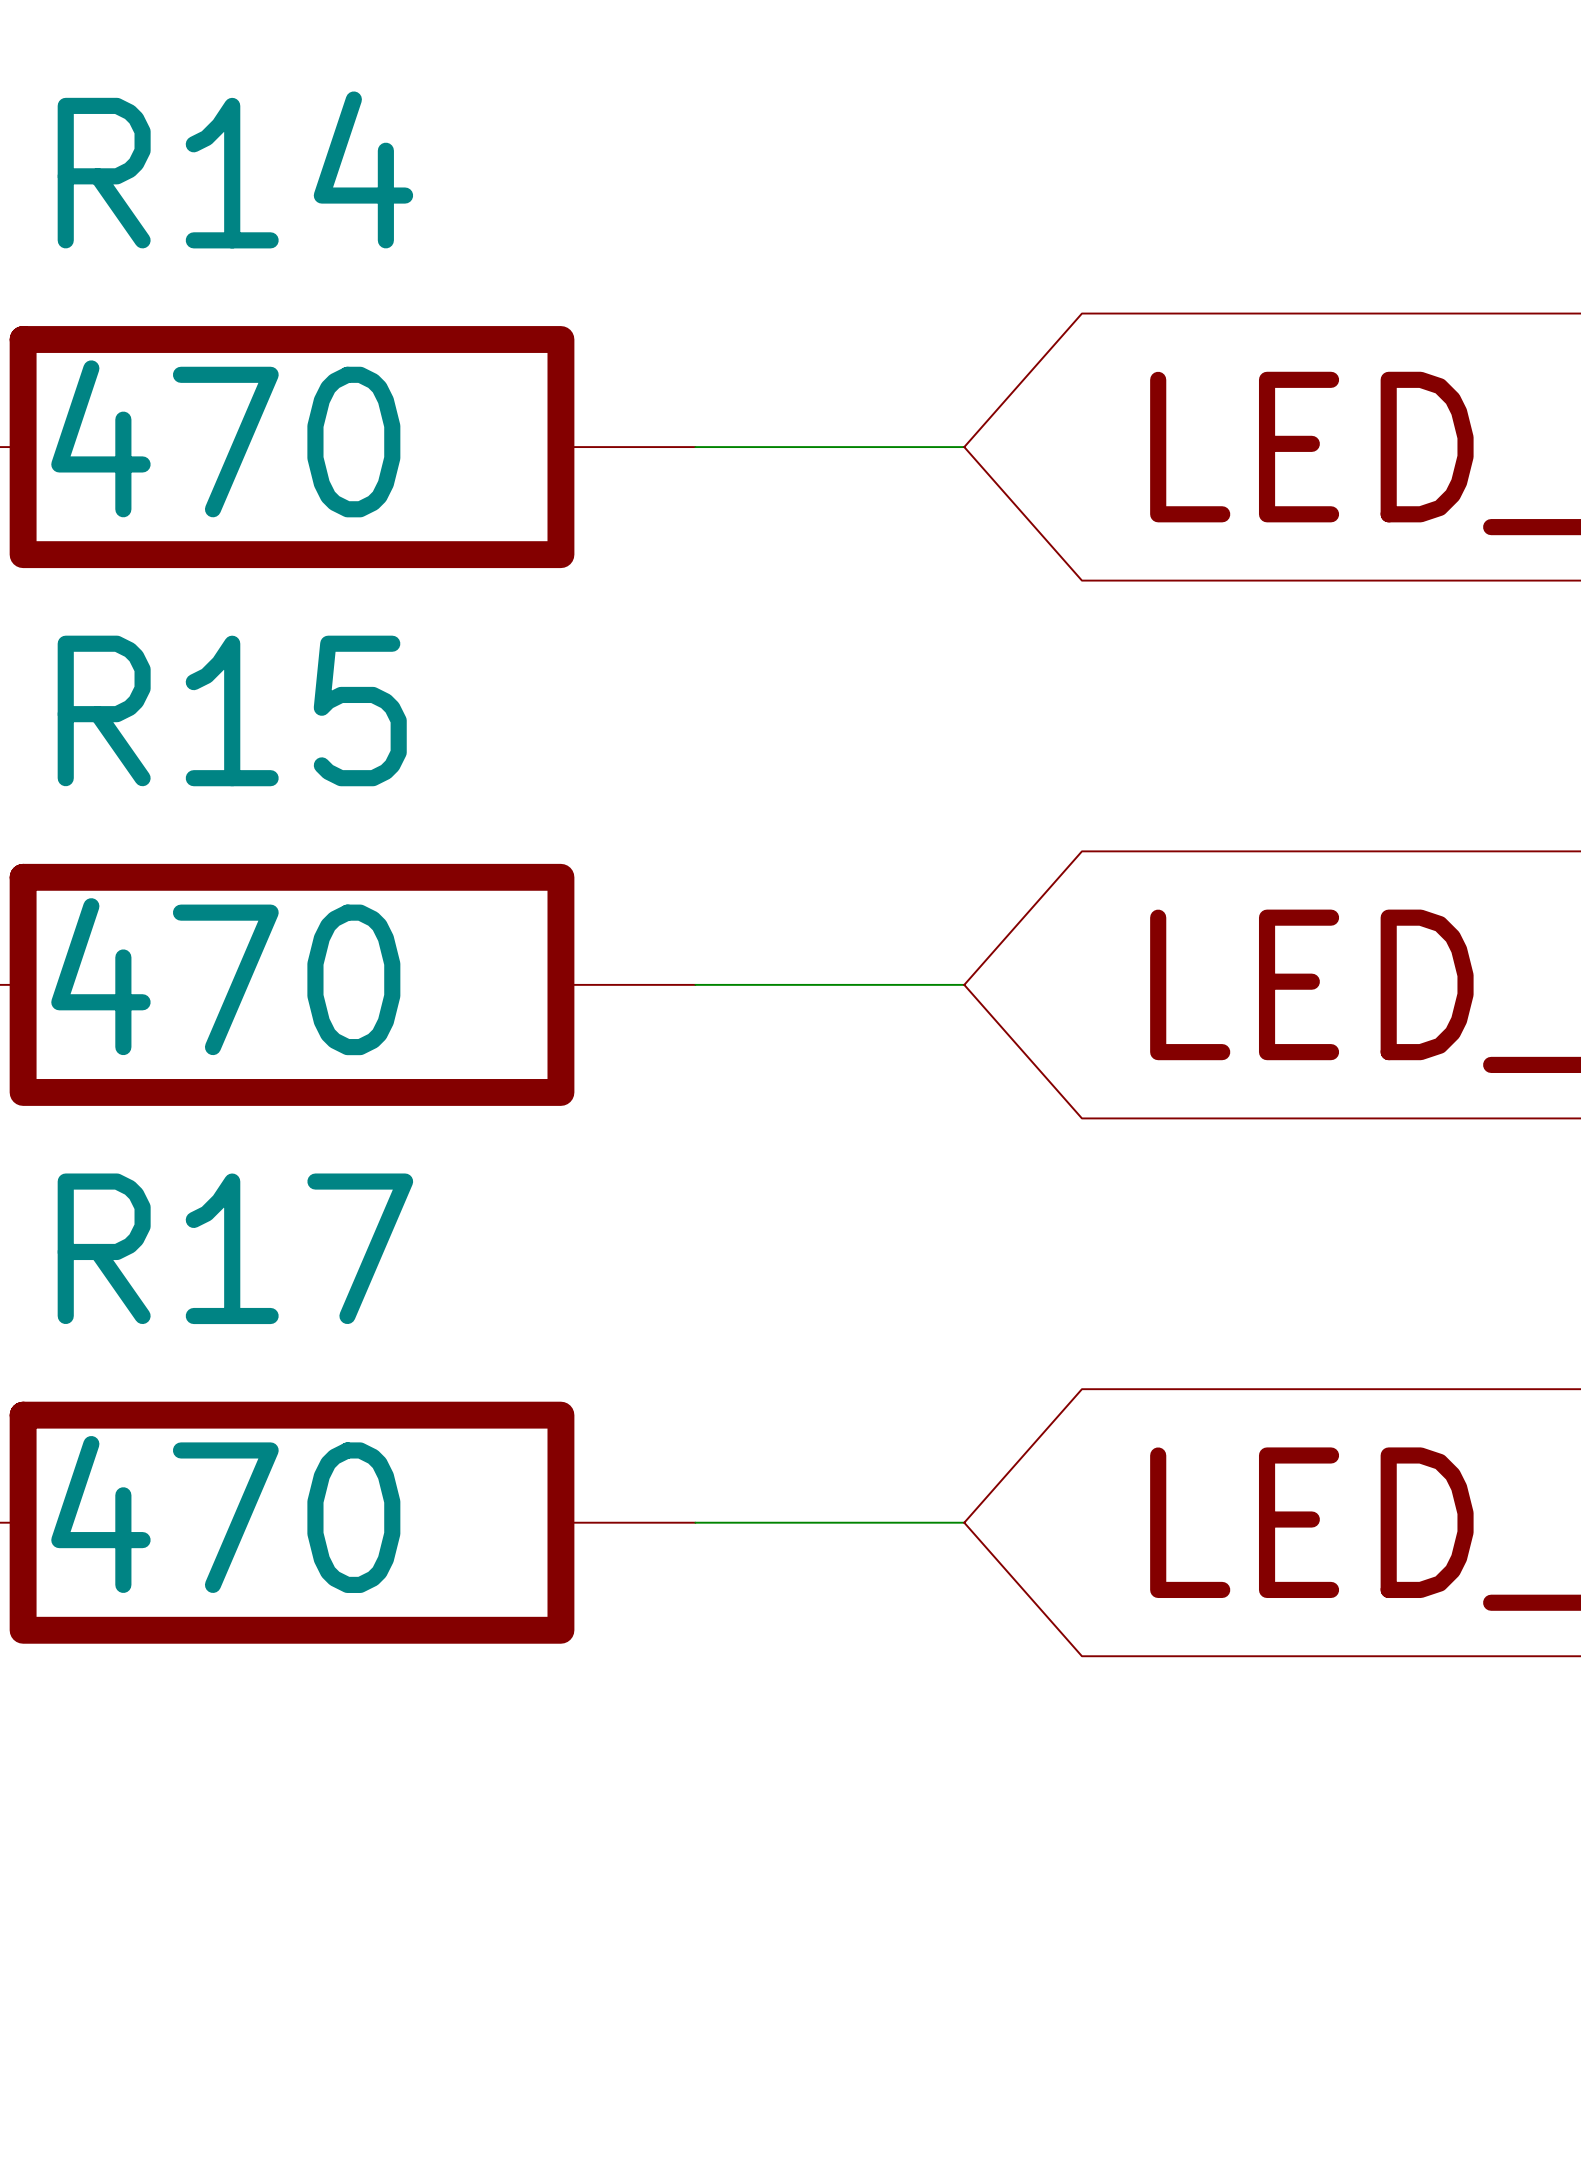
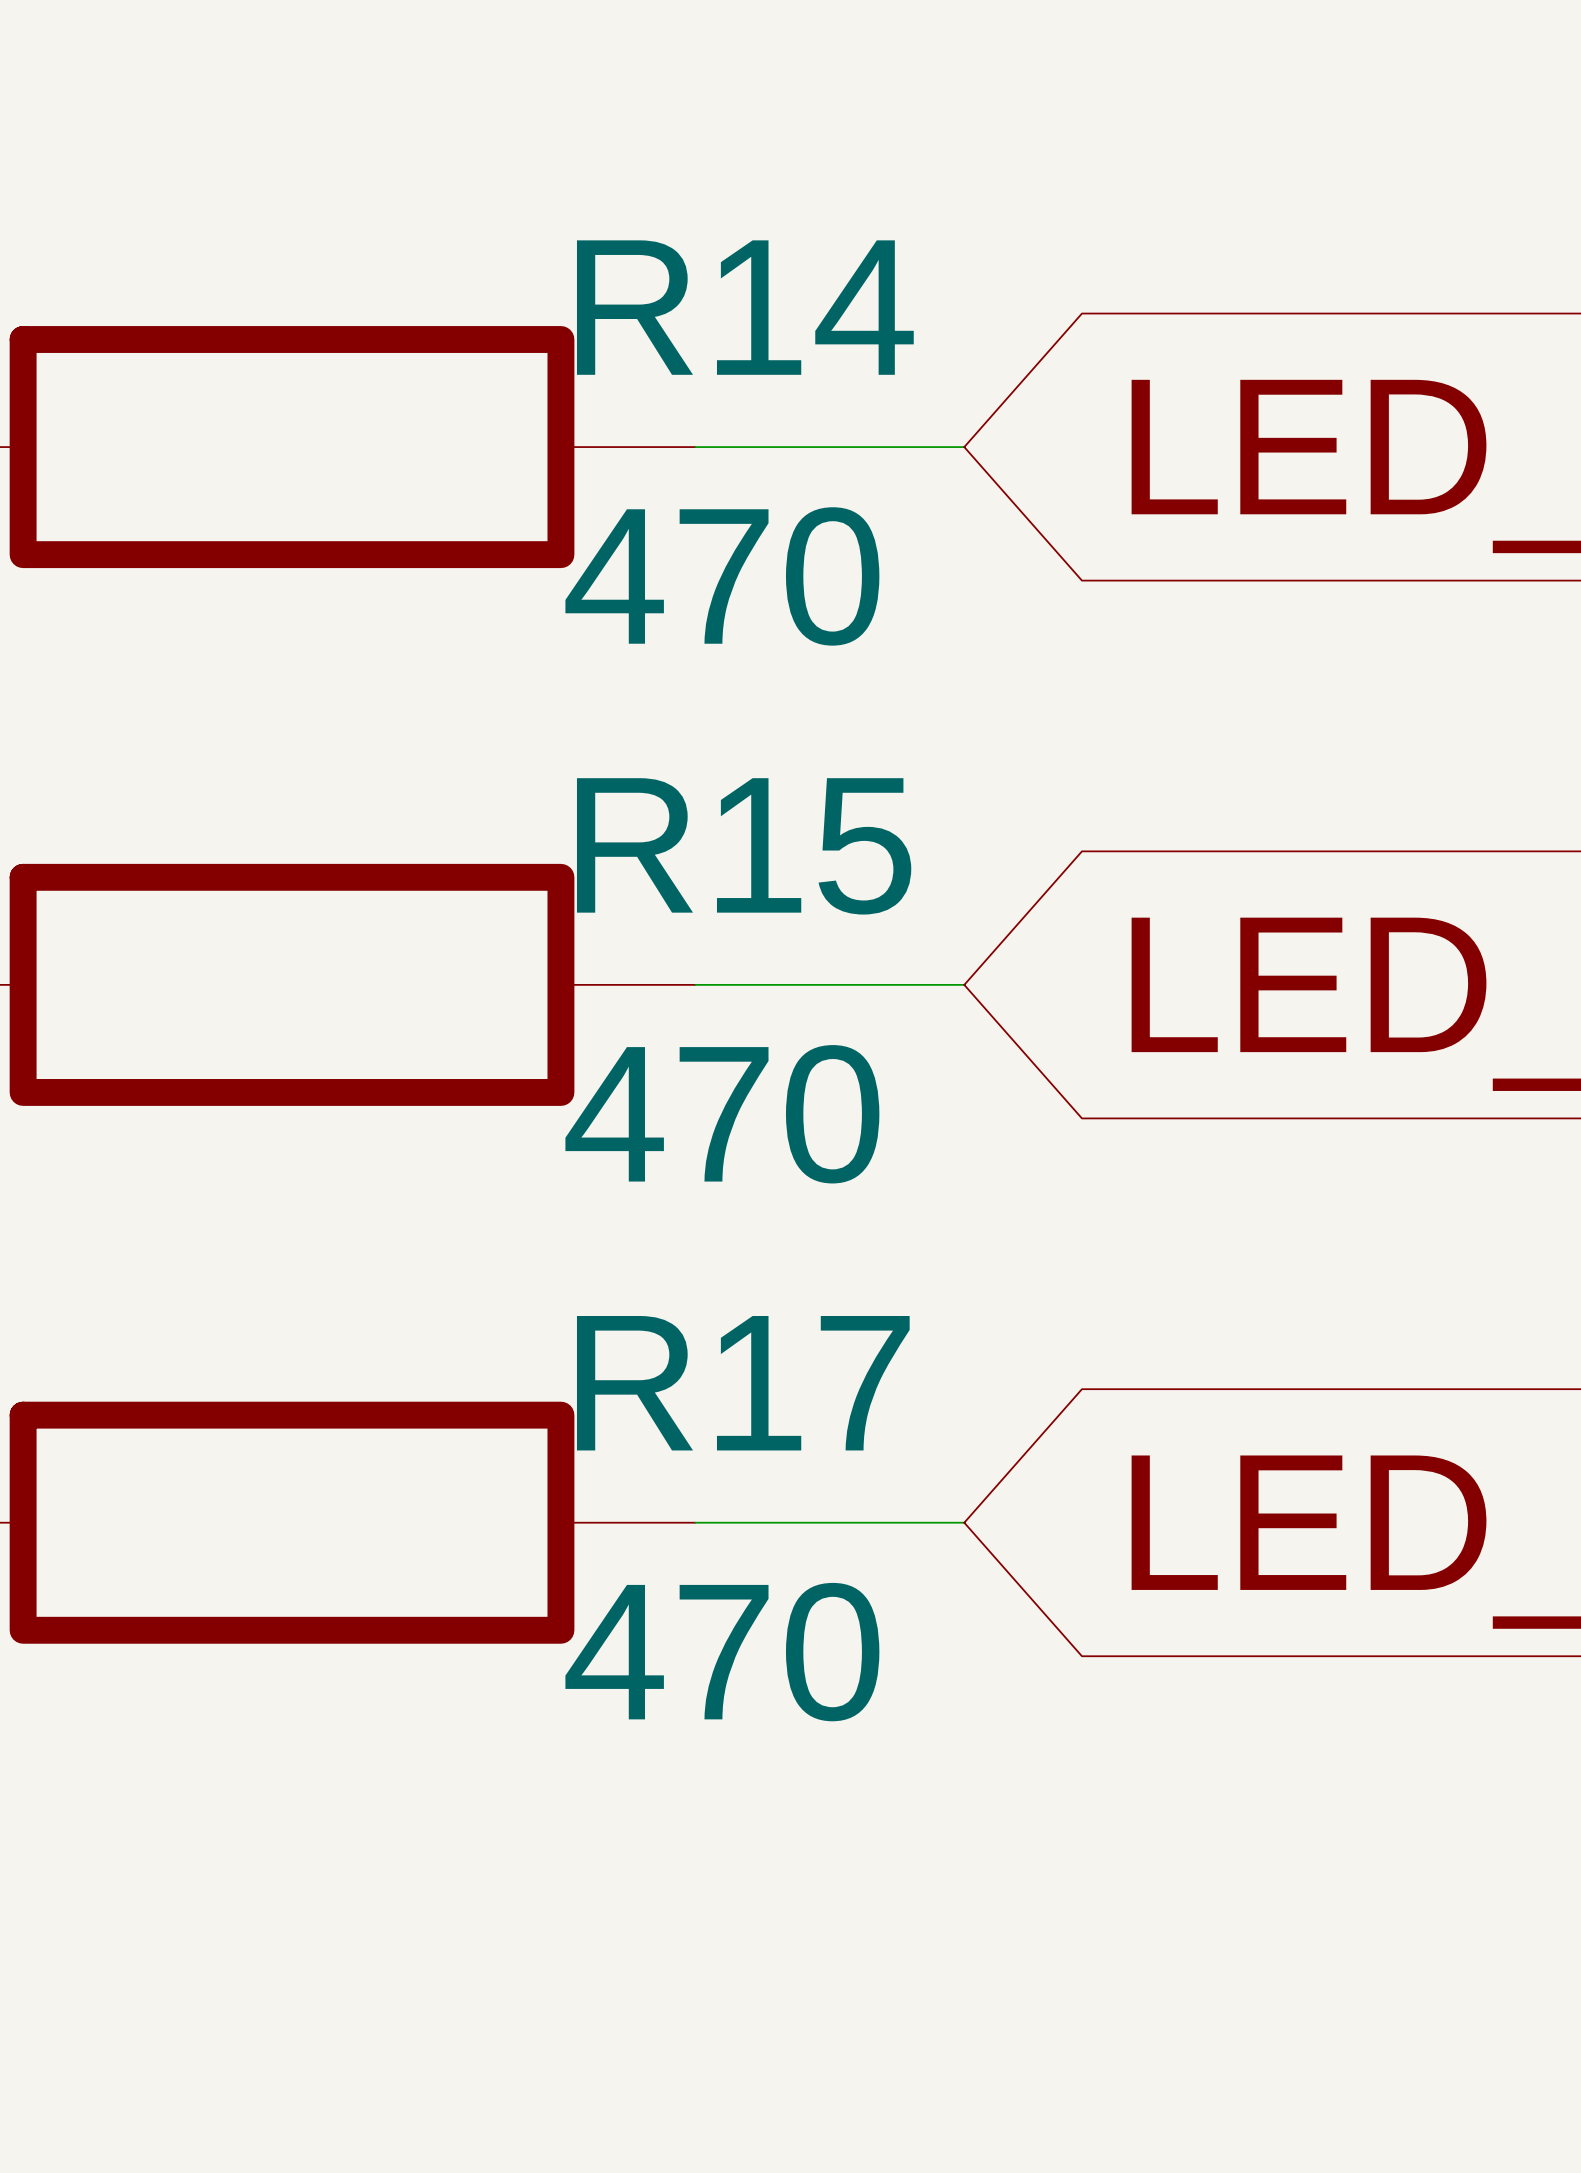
R14 name position: R14 (235, 169) -> R14 (745, 307)
R14 value position: 470 (225, 438) -> 470 (722, 576)
R15 name position: R15 (232, 710) -> R15 (744, 846)
R15 value position: 470 (225, 976) -> 470 (722, 1114)
R17 name position: R17 (235, 1248) -> R17 (743, 1383)
R17 value position: 470 (225, 1514) -> 470 (722, 1652)

